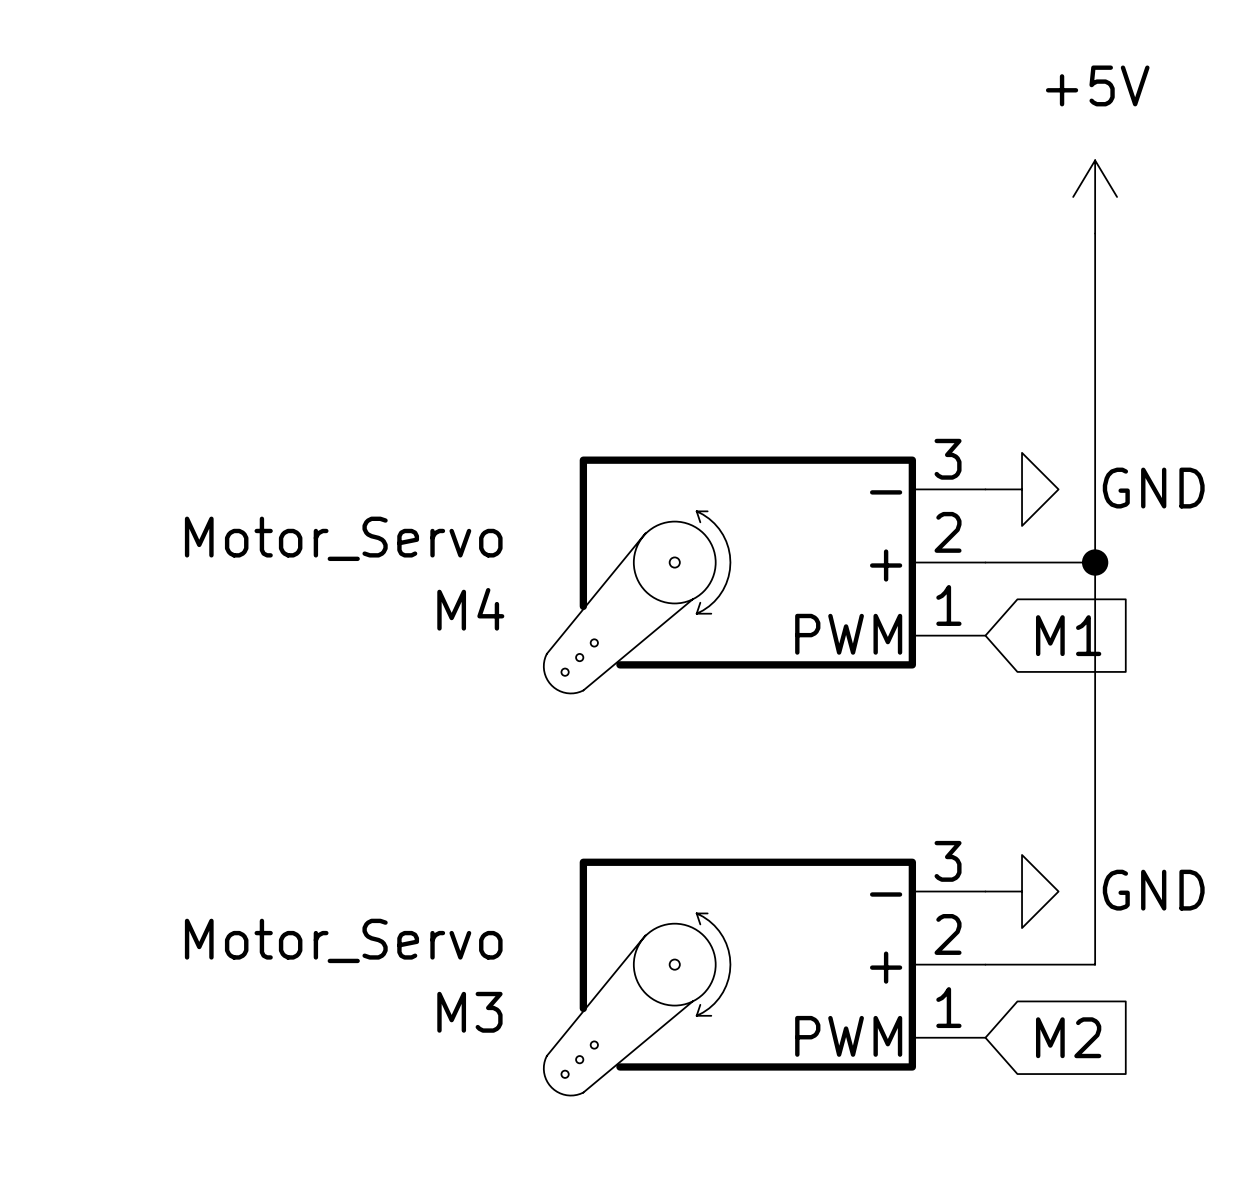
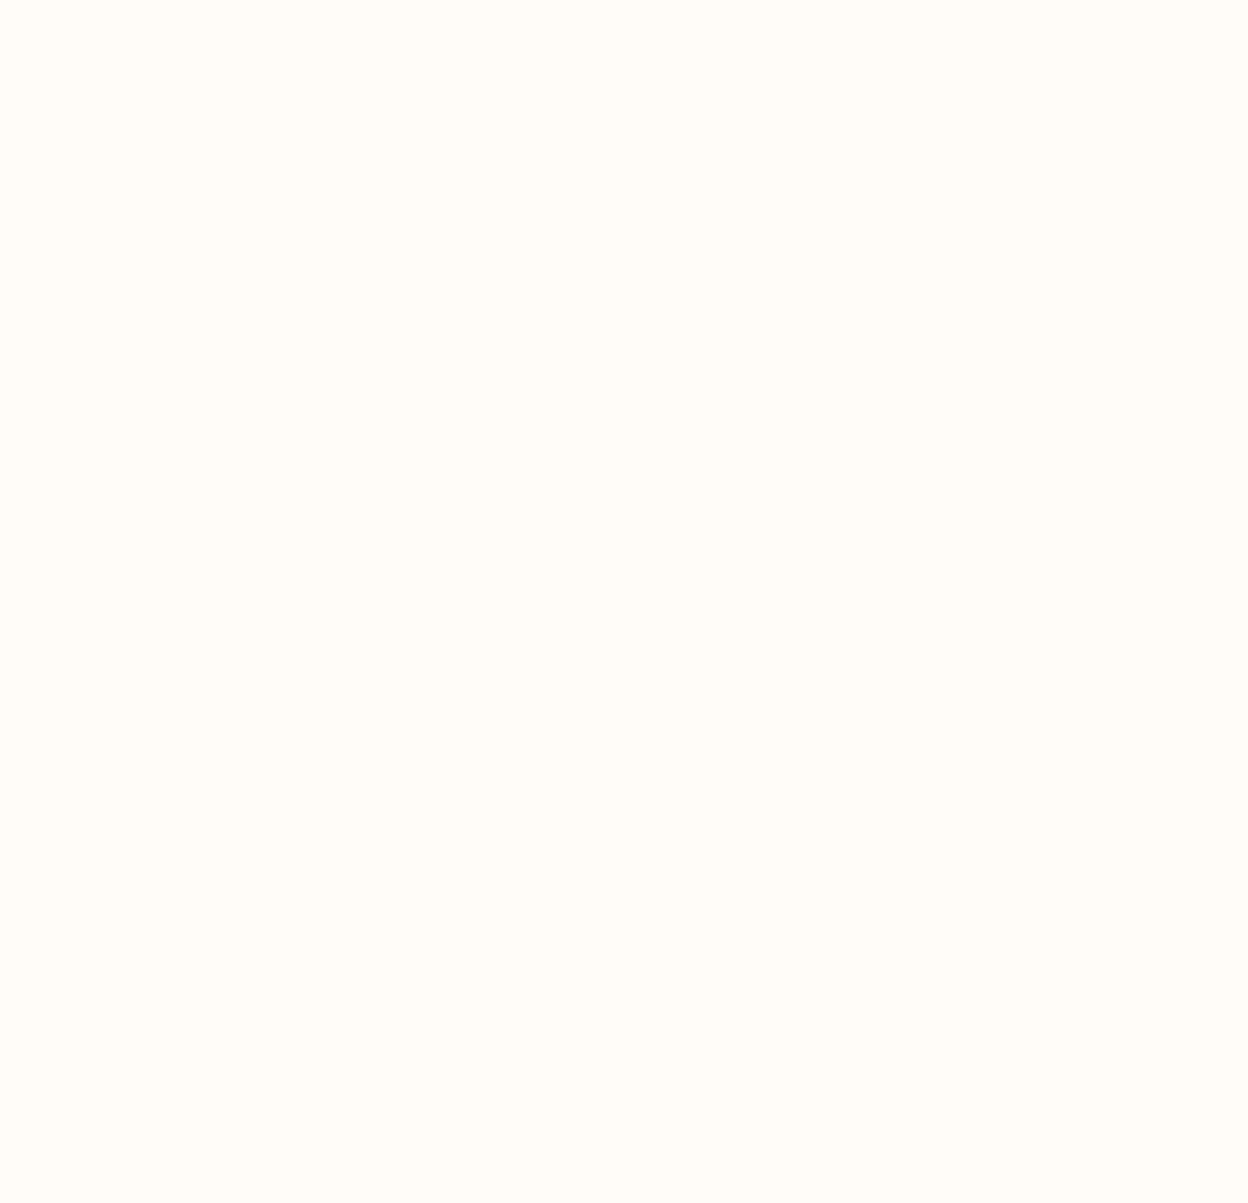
power symbol: +5V (1095, 196) -> none
wire: (1095, 233) (1095, 964) (985, 964) -> none
power symbol: GND (1022, 489) -> none
wire: (985, 562) (1095, 562) -> none
junction: (1095, 562) -> none
M4: Motor_Servo (764, 574) -> none
global label: M1 (1068, 635) -> none
power symbol: GND (1022, 891) -> none
M3: Motor_Servo (764, 977) -> none
global label: M2 (1068, 1037) -> none

